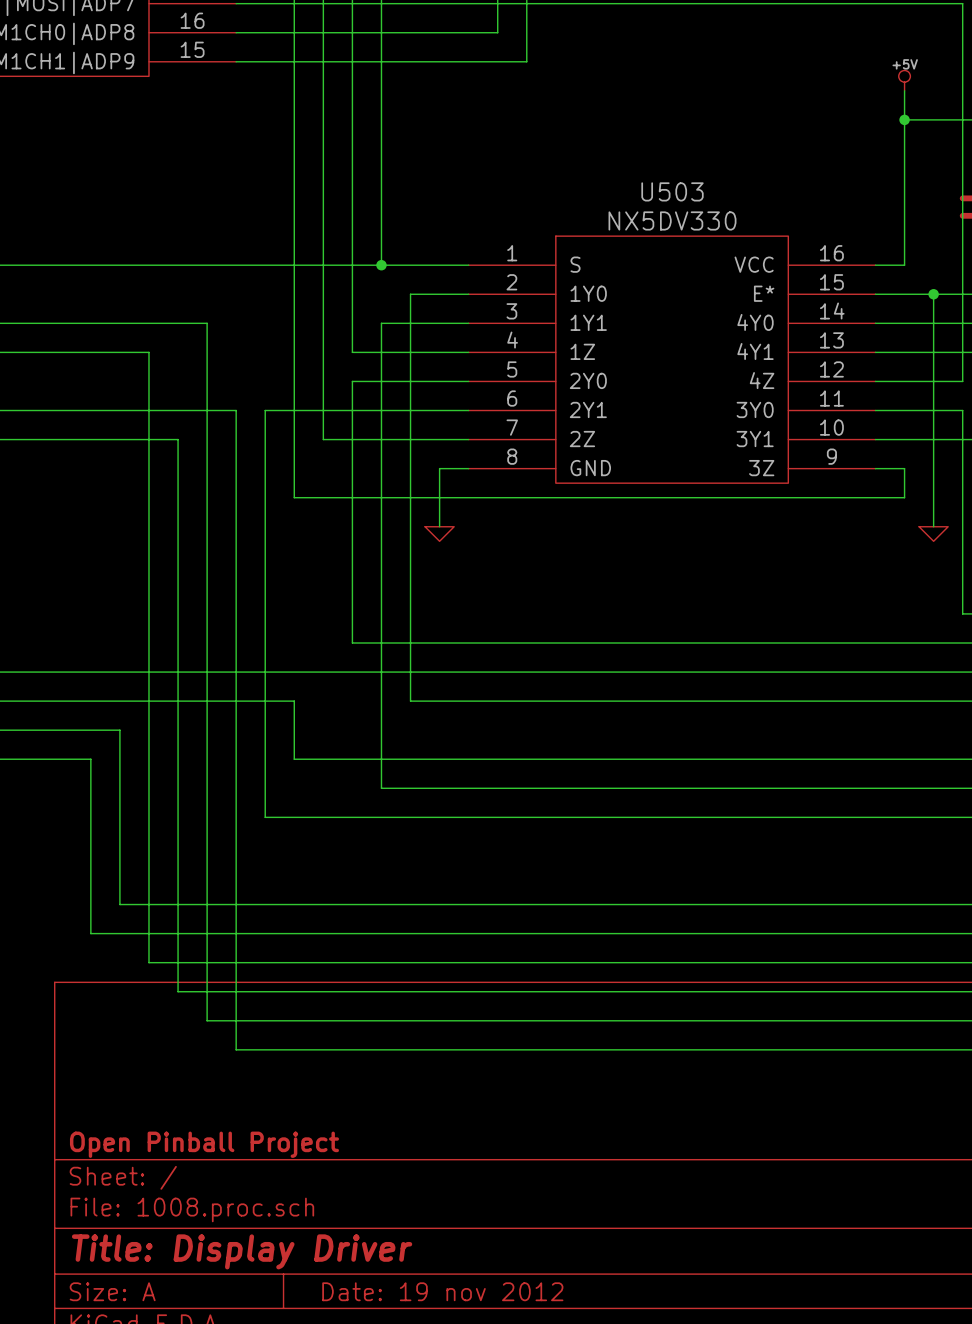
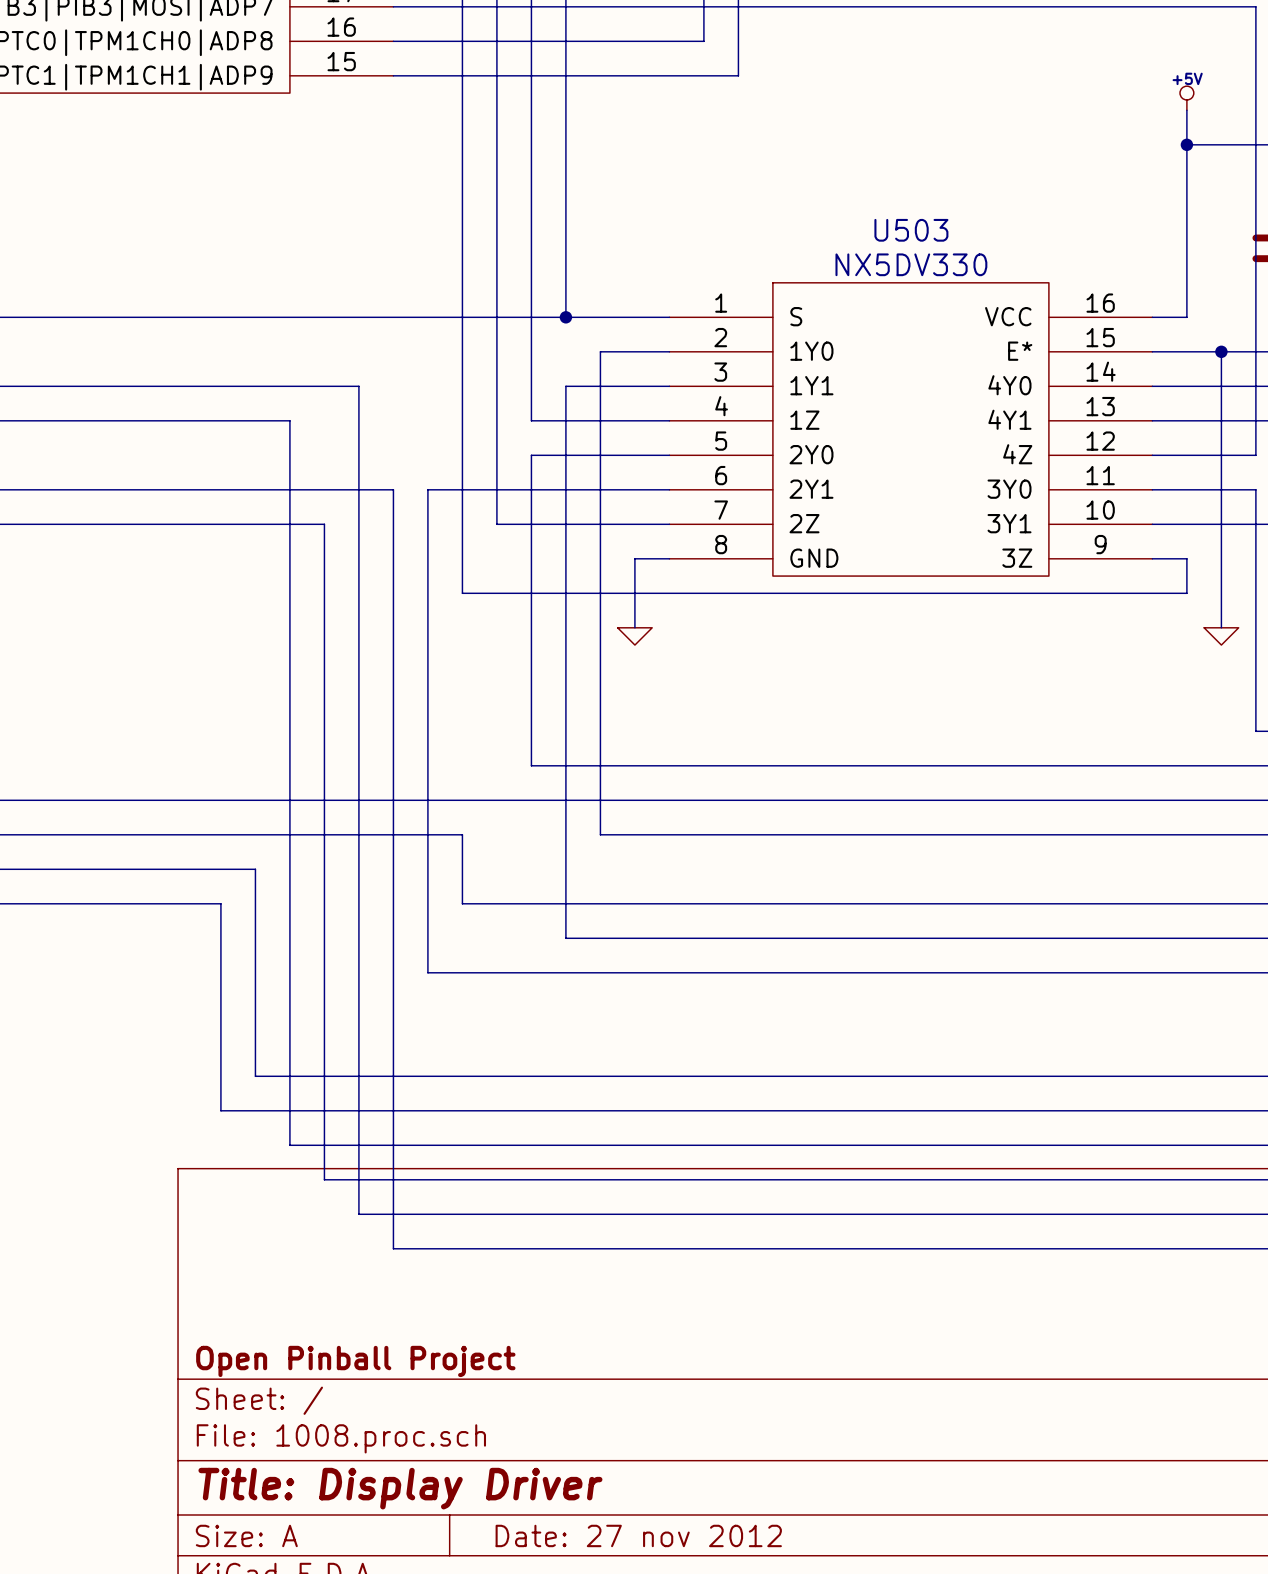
title block: Date: 19 nov 2012 (442, 1291) -> Date: 27 nov 2012 (638, 1535)

